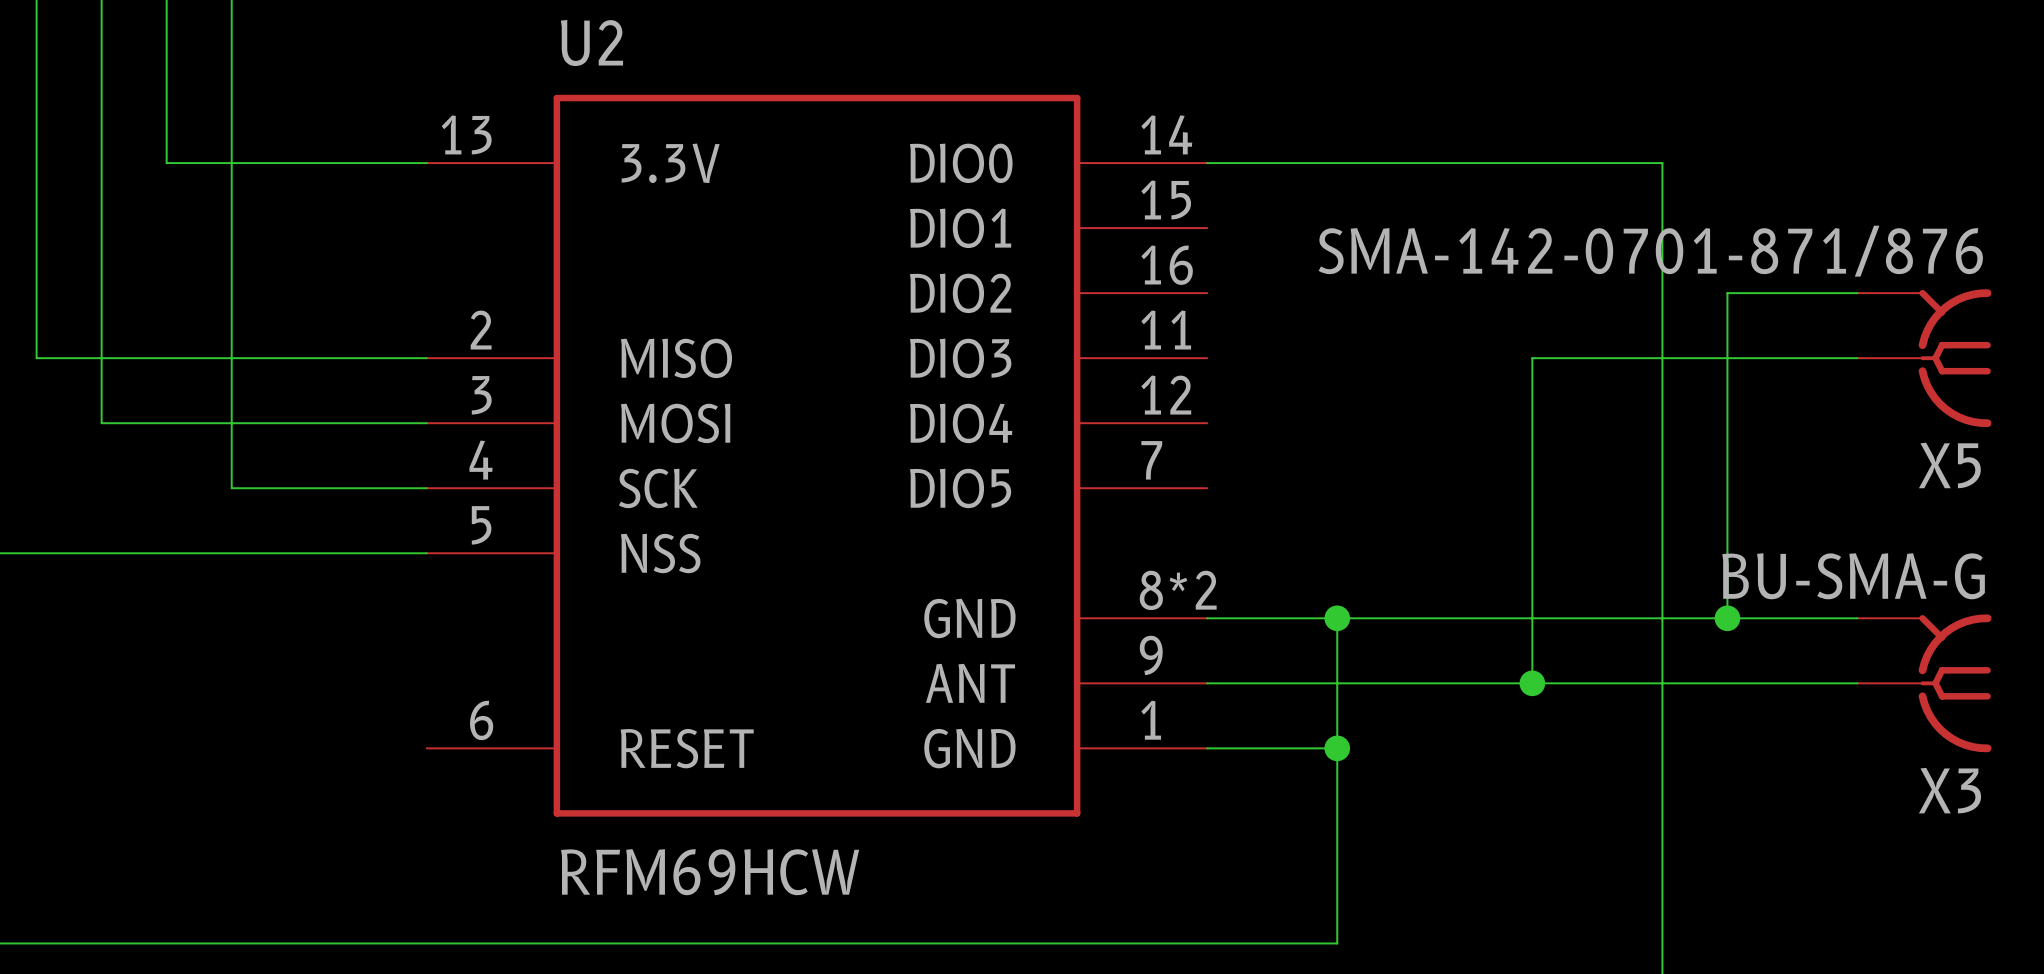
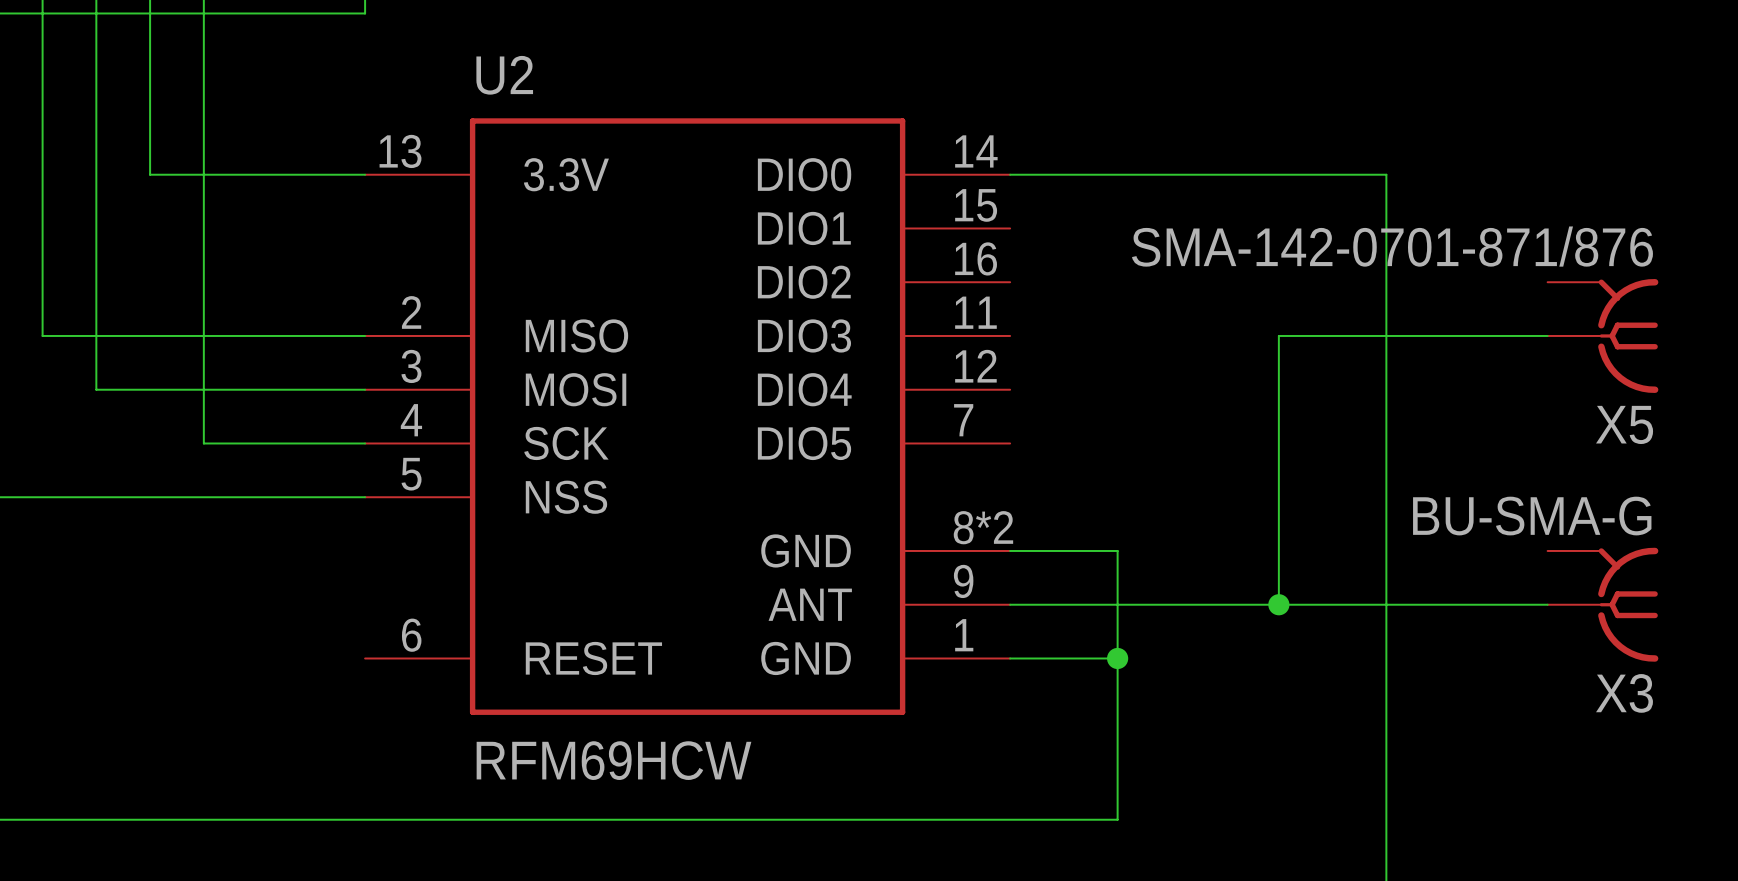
wire: (1857, 293) (1727, 293) (1727, 618) -> none
wire: (1337, 618) (1857, 618) -> none
junction: (1337, 618) -> none
junction: (1727, 618) -> none

